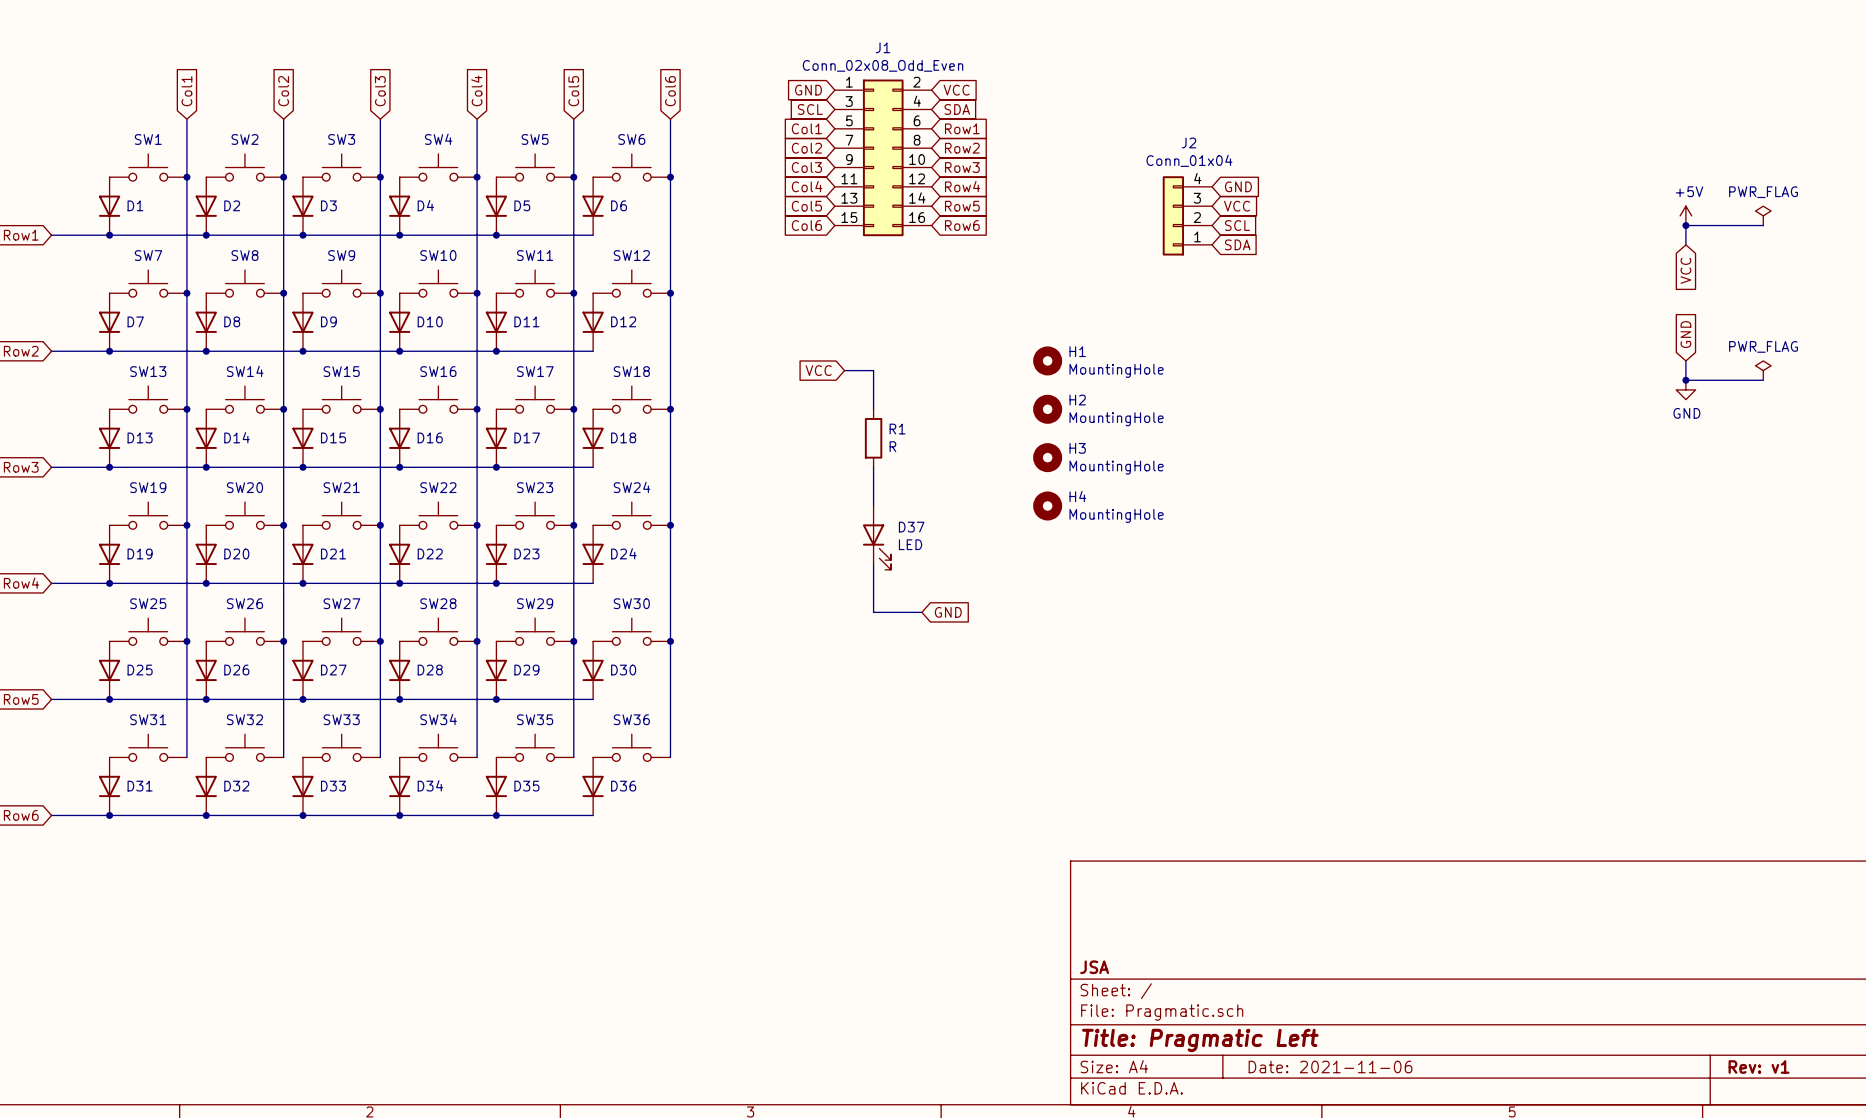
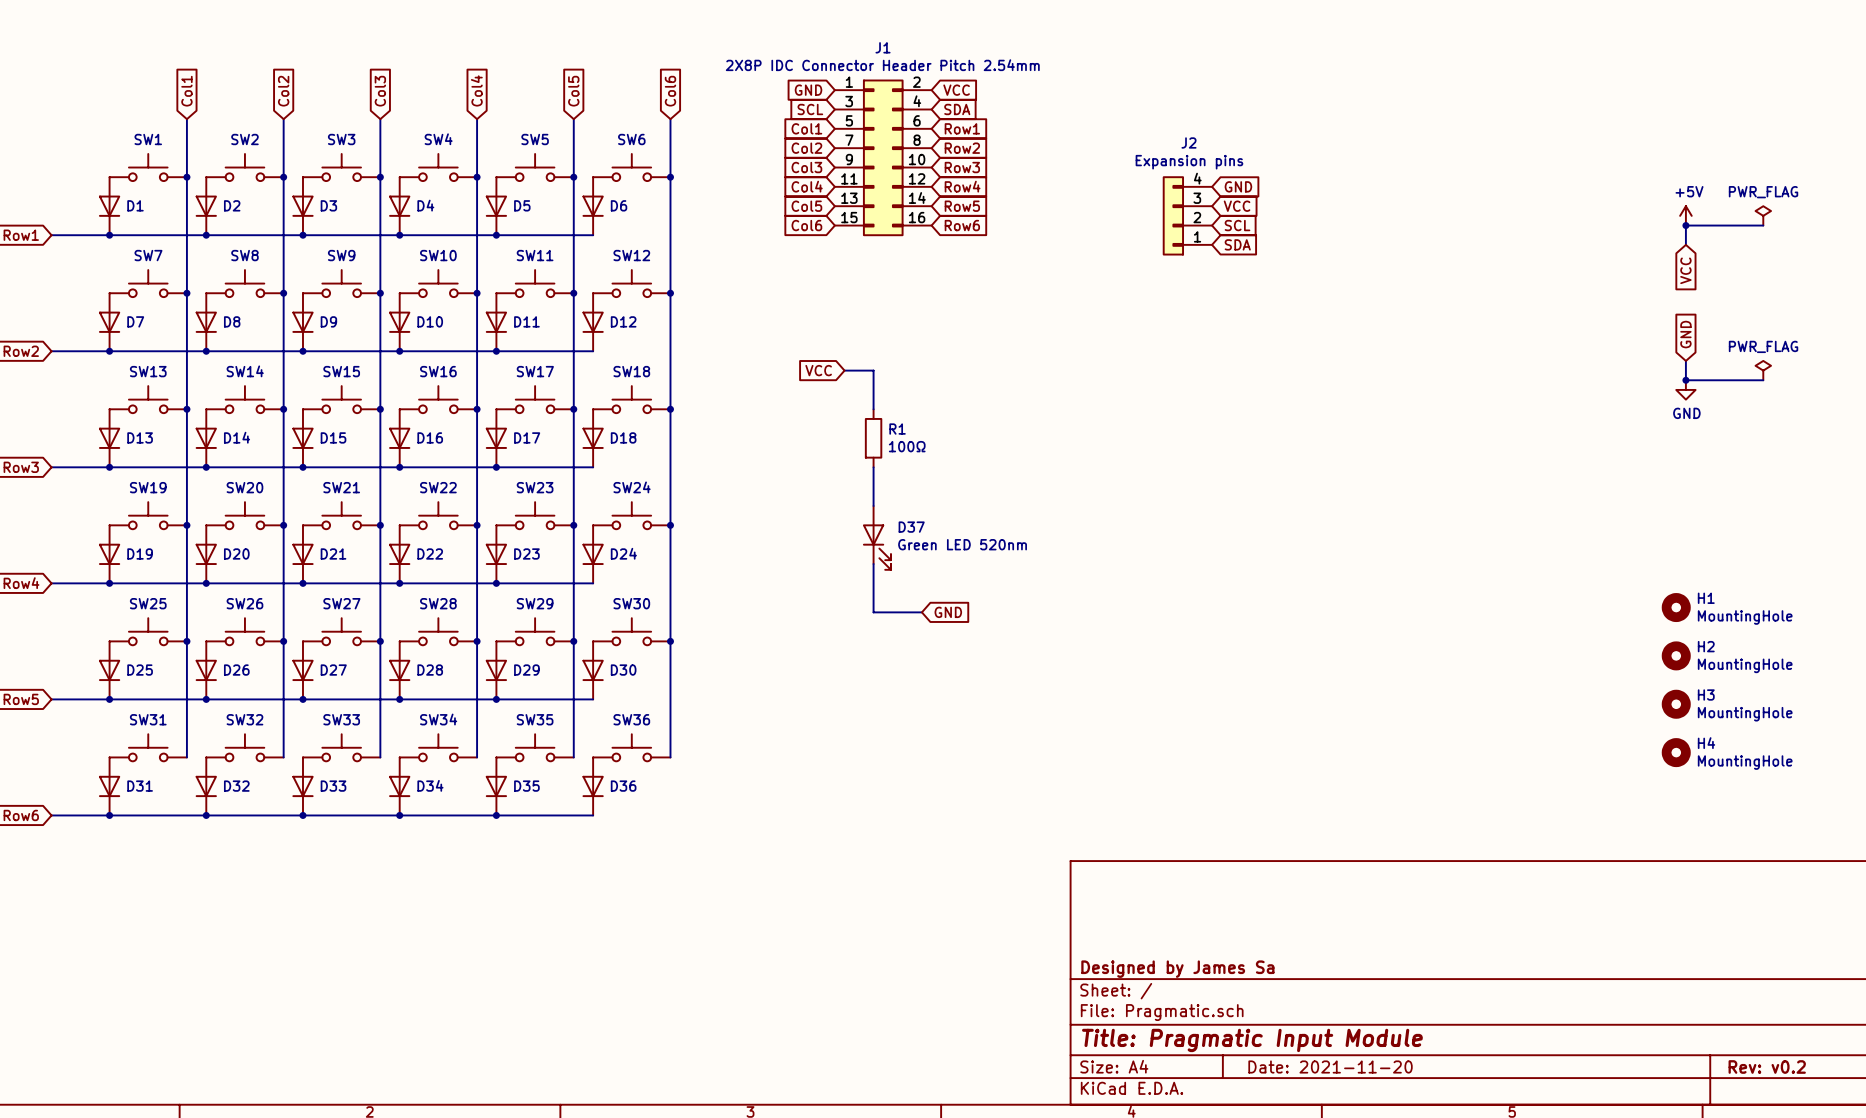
J1 value: Conn_02x08_Odd_Even (883, 65) -> 2X8P IDC Connector Header Pitch 2.54mm (882, 65)
J2 value: Conn_01x04 (1189, 160) -> Expansion pins (1189, 162)
H1 position: (1047, 360) -> (1676, 607)
H2 position: (1047, 409) -> (1676, 655)
R1 value: R (892, 446) -> 100Ω (907, 446)
H3 position: (1047, 457) -> (1676, 704)
H4 position: (1047, 506) -> (1676, 752)
D37 value: LED (910, 544) -> Green LED 520nm (962, 544)
title block: JSA (1094, 967) -> Designed by James Sa (1177, 969)
title block: Title: Pragmatic Left (1200, 1040) -> Title: Pragmatic Input Module (1252, 1040)
title block: Date: 2021-11-06 (1330, 1066) -> Date: 2021-11-20 (1330, 1066)
title block: Rev: v1 (1759, 1066) -> Rev: v0.2 (1767, 1066)

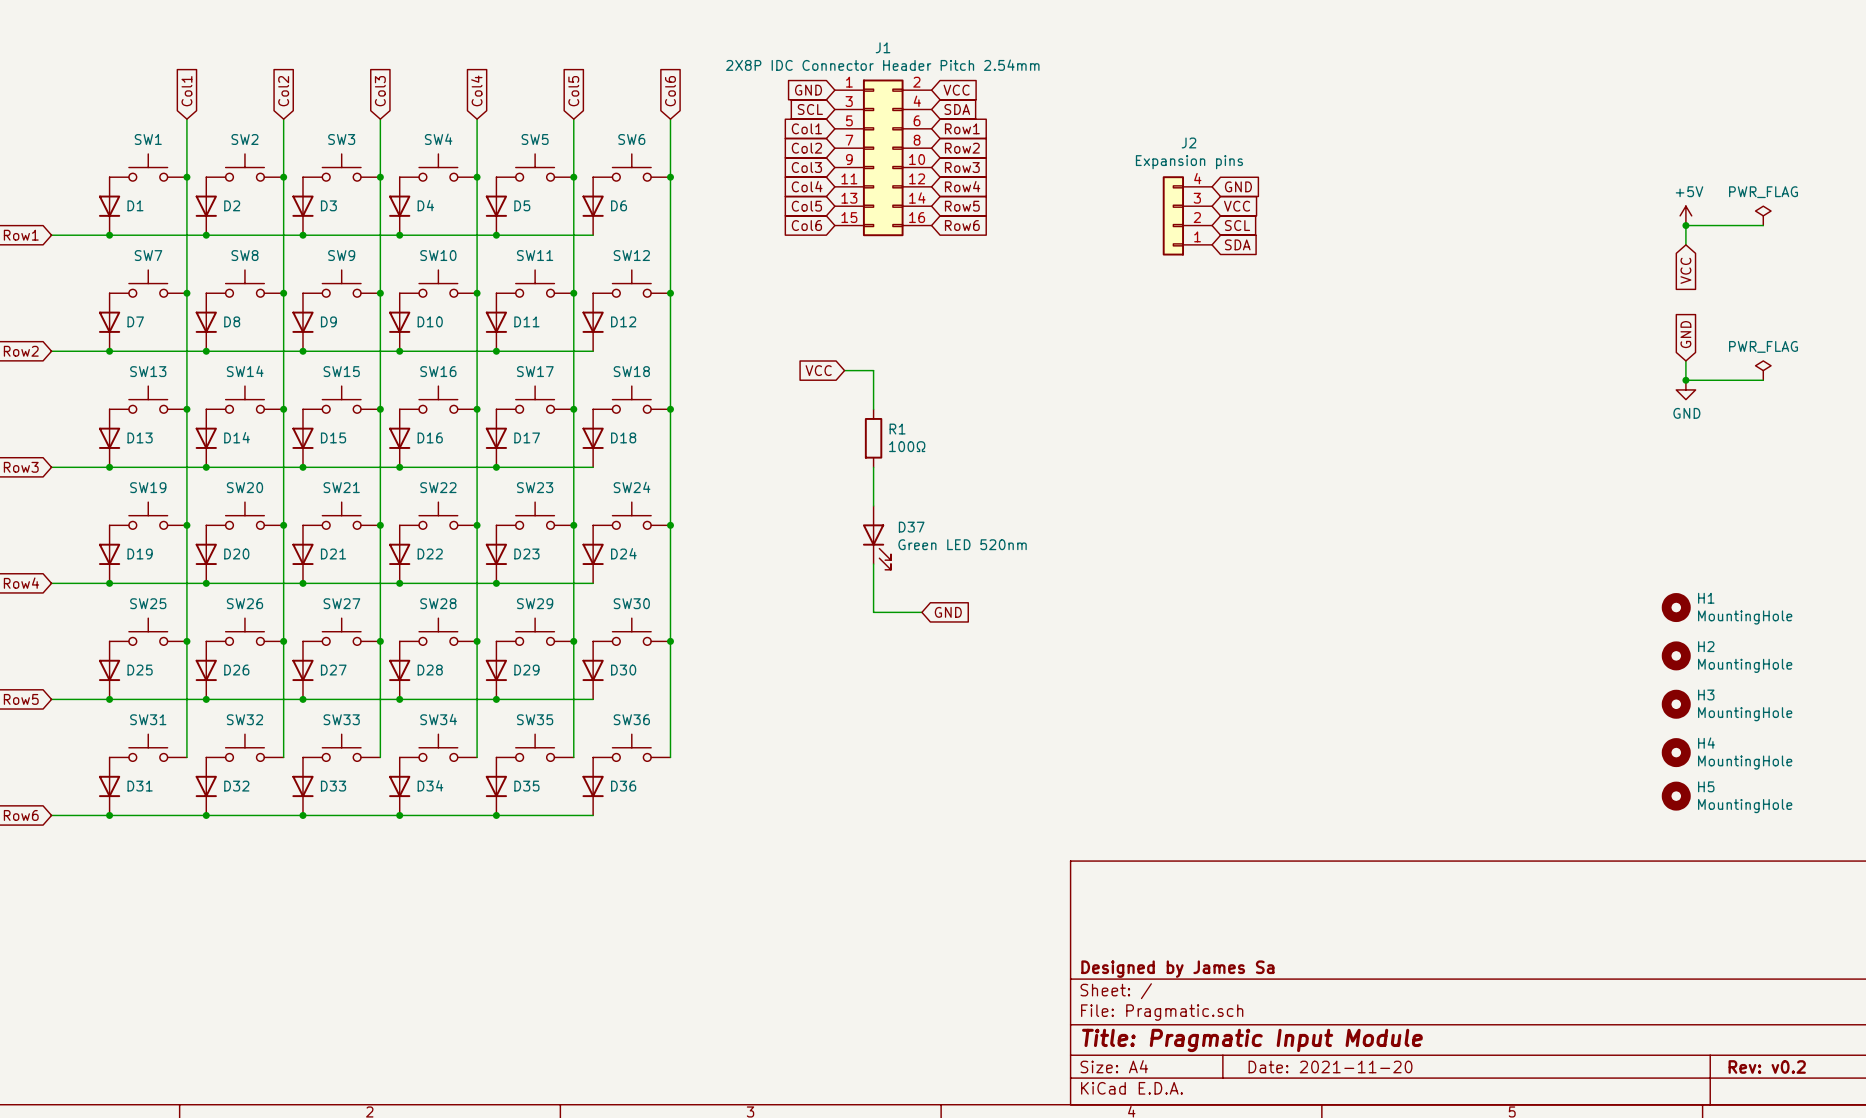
H5: none -> MountingHole (1676, 796)

